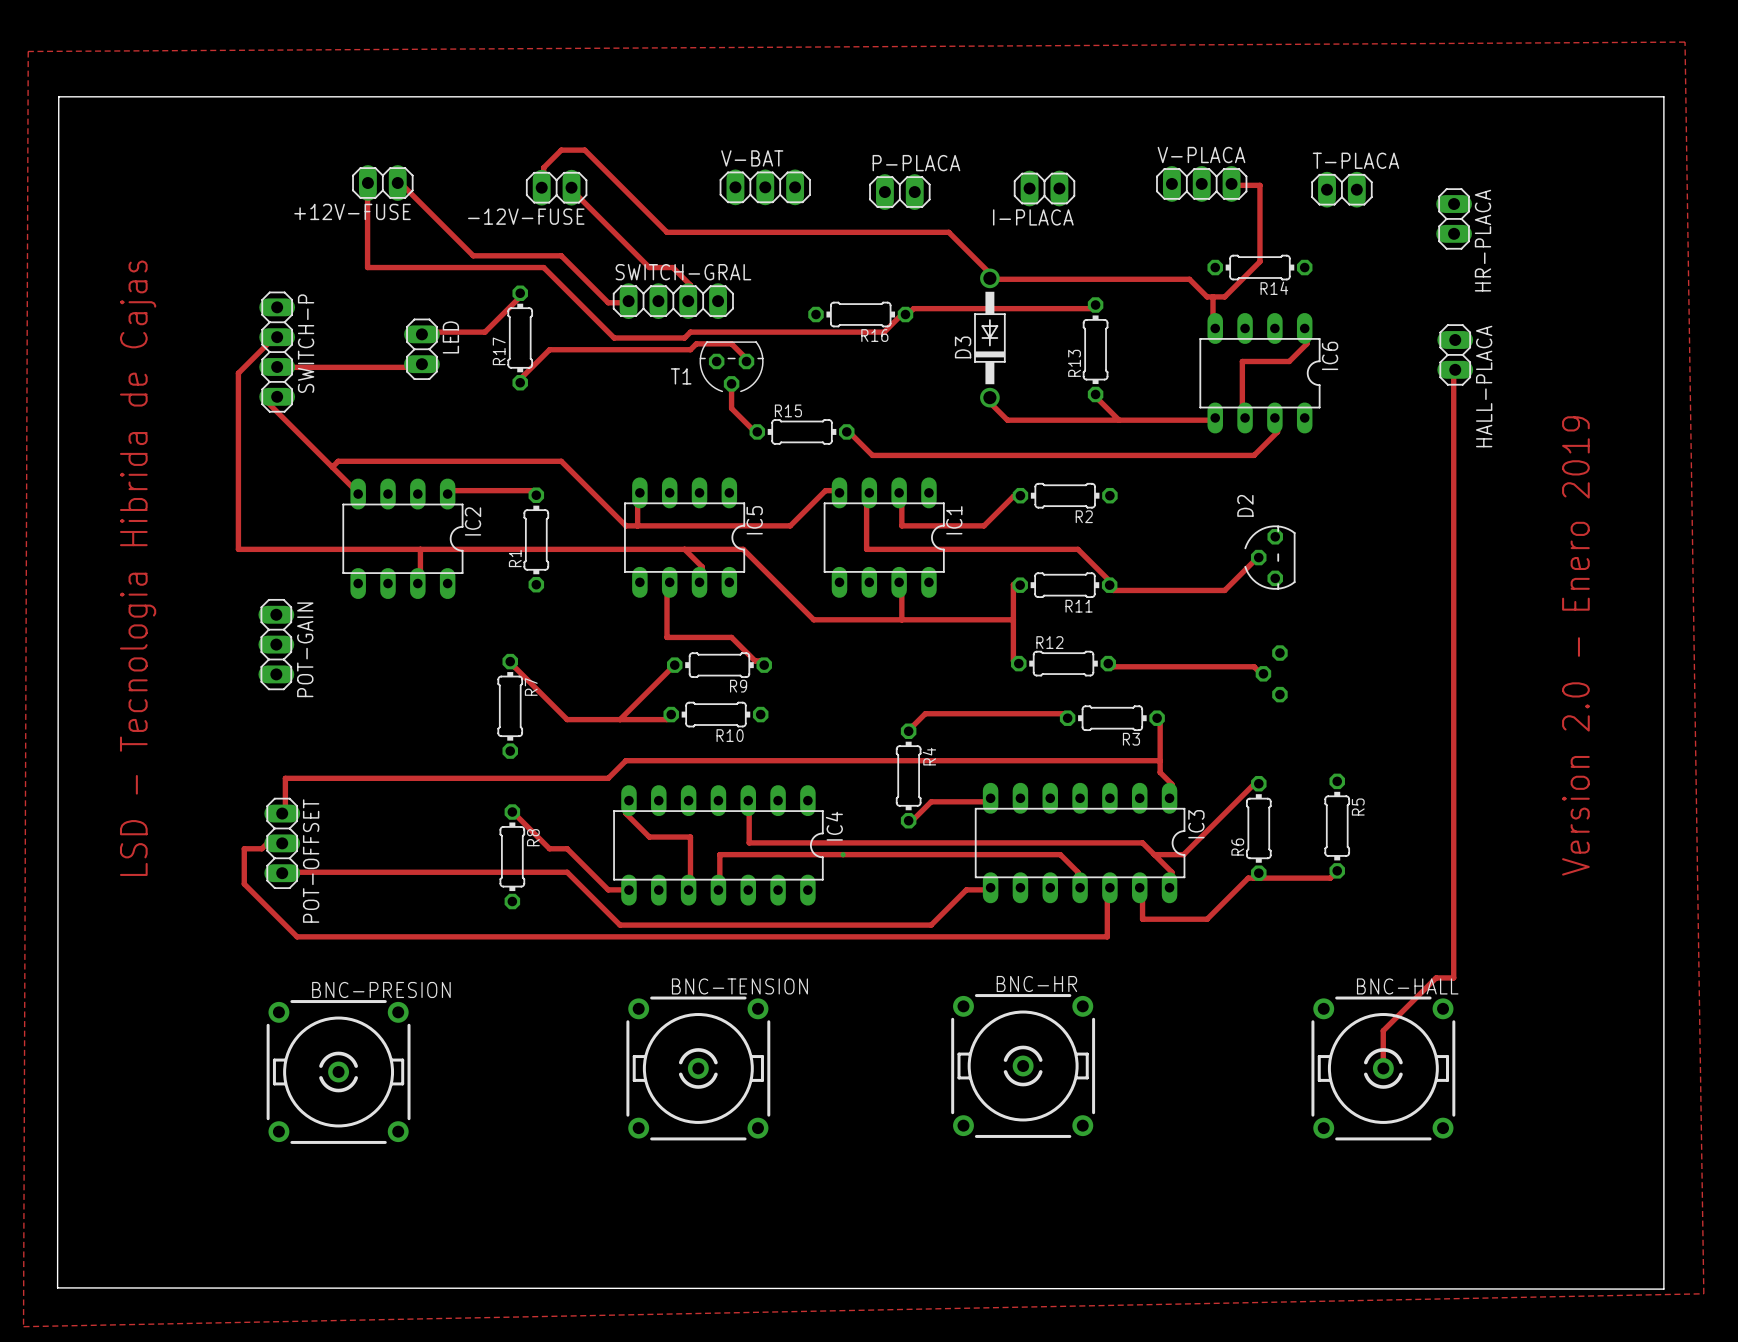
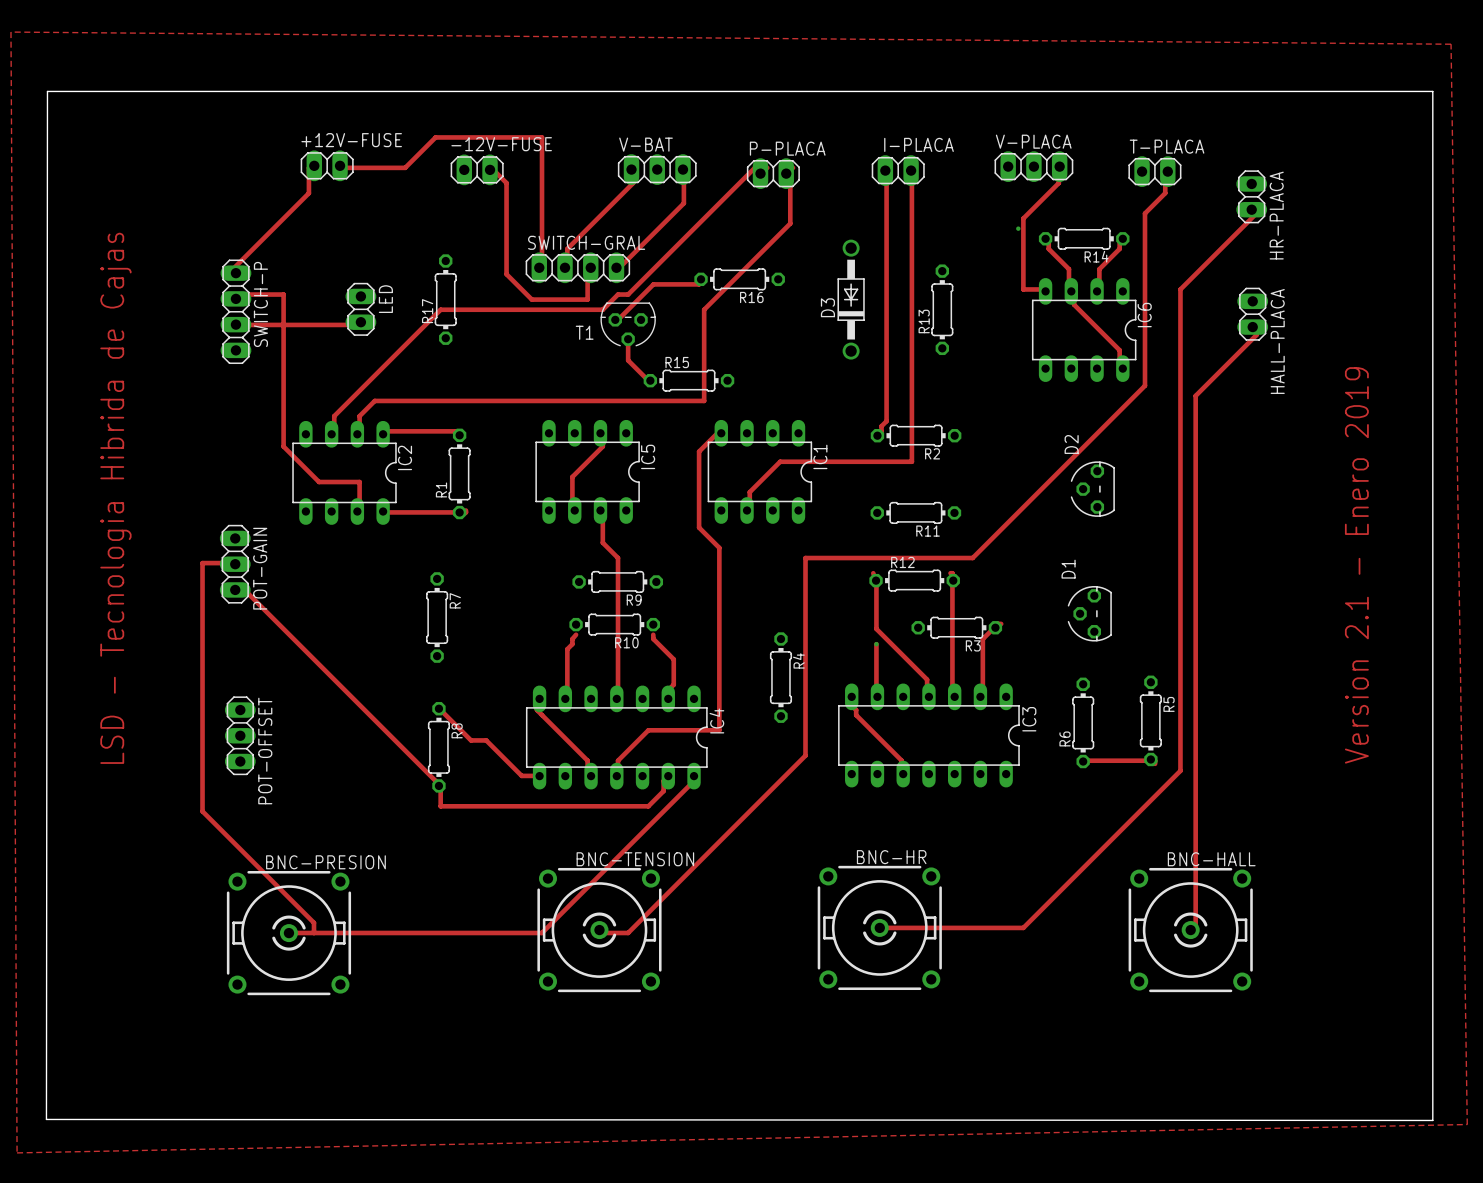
zone outline: (1685, 42) (28, 51) (23, 1326) -> (1451, 44) (10, 32) (17, 1152)
track: (561, 150) (543, 167) (543, 185) (541, 187) -> (481, 137) (435, 137) (405, 167) (337, 167)
track: (584, 150) (667, 232) (948, 232) (989, 273) (989, 279) (1189, 279) (1207, 296) (1224, 296) (1259, 261) (1259, 185) (1231, 183) -> (501, 137) (542, 137) (542, 269) (538, 269)
track: (367, 183) (367, 267) (543, 267) (614, 338) (620, 338) -> (489, 167) (491, 167) (506, 183) (506, 274) (531, 299)
track: (397, 183) (402, 185) (473, 255) (561, 255) (608, 302) (628, 301) -> none
track: none -> (311, 167) (308, 167) (308, 193) (232, 271)
track: none -> (632, 167) (633, 183) (567, 248) (567, 269) (564, 269)
track: none -> (684, 167) (683, 203) (616, 269)
track: none -> (793, 167) (790, 167) (790, 223) (704, 309) (704, 400) (374, 400) (359, 416) (359, 431) (357, 433)
track: none -> (888, 167) (886, 167) (886, 421) (881, 426) (881, 431) (877, 435)
track: none -> (1168, 167) (1165, 167) (1165, 193) (1144, 213) (1144, 385) (972, 558) (805, 558) (805, 755) (628, 932) (602, 932) (599, 930)
track: (571, 187) (649, 267) (672, 267) (690, 285) (690, 296) (688, 301) -> none
+12V-FUSE name position: +12V-FUSE (352, 211) -> +12V-FUSE (351, 140)
-12V-FUSE name position: -12V-FUSE (526, 216) -> -12V-FUSE (501, 144)
I-PLACA name position: I-PLACA (1033, 217) -> I-PLACA (918, 144)
track: none -> (1256, 211) (1256, 213) (1180, 289) (1180, 770) (1023, 927) (881, 927)
via: none -> (1018, 228)
track: none -> (1045, 238) (1048, 238) (1048, 248) (1068, 269) (1068, 289) (1074, 294) (1074, 304) (1119, 350) (1119, 365) (1122, 368)
track: none -> (1122, 238) (1119, 238) (1119, 248) (1099, 269) (1099, 289) (1097, 291)
track: (520, 293) (520, 296) (484, 332) (426, 332) (421, 334) -> none
track: (1213, 296) (1213, 326) -> (1059, 167) (1058, 183) (1023, 218) (1023, 289) (1043, 289)
track: none -> (590, 269) (587, 269) (587, 299)
track: (1095, 305) (1095, 308) (913, 308) (907, 314) (901, 314) (884, 332) (731, 332) -> (767, 167) (764, 167) (764, 162) (759, 162) (628, 294)
track: none -> (701, 279) (699, 279) (699, 284) (653, 284) (618, 319) (615, 319)
track: (1304, 328) (1306, 332) (1306, 343) (1289, 361) (1242, 361) (1242, 414) (1245, 417) -> none
track: (719, 332) (690, 332) (684, 338) -> (618, 294) (602, 309) (592, 309)
track: (277, 337) (273, 338) (238, 373) (238, 549) (373, 549) -> (232, 296) (232, 294) (283, 294) (283, 446) (319, 482)
track: (549, 349) (520, 379) (520, 382) -> (471, 309) (440, 309) (334, 416) (334, 431) (331, 433)
track: (690, 349) (696, 343) (731, 343) (749, 361) (746, 361) -> none
track: (1455, 369) (1453, 373) (1453, 977) (1436, 977) (1383, 1030) (1383, 1068) -> none
track: none -> (1256, 332) (1256, 335) (1195, 395) (1195, 927)
track: (1095, 394) (1095, 396) (1119, 420) -> none
track: (277, 396) (267, 396) (267, 402) (358, 494) -> none
track: (989, 397) (989, 402) (1007, 420) (1213, 420) (1215, 417) -> none
track: (1274, 417) (1277, 420) (1277, 431) (1254, 455) (872, 455) (849, 431) (846, 431) -> none
track: (332, 467) (338, 461) (561, 461) (625, 525) (790, 525) (825, 490) (837, 490) -> none
track: (639, 492) (637, 496) (637, 525) -> none
track: (869, 492) (866, 496) (866, 549) (1077, 549) (1113, 584) (1109, 585) (1113, 590) (1224, 590) (1258, 557) -> none
track: (899, 492) (901, 496) (901, 525) (907, 525) -> (747, 510) (749, 507) (749, 492) (780, 461)
track: (1020, 495) (1013, 496) (984, 525) -> (914, 167) (911, 167) (911, 461) (846, 461)
track: (420, 549) (743, 549) (813, 619) (1013, 619) -> none
track: (684, 549) (702, 566) (702, 578) (699, 582) -> (616, 698) (618, 558) (602, 542) (602, 512) (600, 510)
track: none -> (383, 510) (384, 512) (466, 512) (466, 510)
track: (669, 582) (667, 584) (667, 637) (731, 637) (755, 660) (760, 660) (764, 665) -> (574, 510) (572, 507) (572, 476) (602, 446) (602, 436) (600, 433)
track: (899, 582) (901, 584) (901, 619) -> none
track: (1020, 585) (1013, 584) (1013, 660) (1018, 663) -> none
track: none -> (232, 563) (202, 563) (202, 811) (313, 922) (313, 932)
text: Version 2.0 - Enero 2019 (1575, 645) -> Version 2.1 - Enero 2019 (1356, 565)
track: none -> (873, 573) (876, 583) (876, 628) (927, 679) (927, 694) (928, 696)
track: none -> (950, 573) (952, 573) (952, 694) (954, 696)
track: (510, 661) (567, 719) (667, 719) (671, 714) -> none
track: (1108, 663) (1113, 666) (1254, 666) (1263, 673) -> none
track: (674, 665) (620, 719) -> none
D1 side: bottom (1271, 673) -> top (1089, 613)
track: none -> (1001, 623) (998, 623) (982, 639) (982, 694) (980, 696)
track: (1067, 718) (1066, 713) (925, 713) (908, 731) -> none
track: (1157, 718) (1160, 719) (1160, 772) (1171, 784) (1171, 795) (1169, 798) -> none
track: none -> (576, 634) (572, 639) (572, 644) (567, 649) (567, 694) (565, 698)
track: none -> (653, 634) (653, 639) (673, 659) (673, 684) (668, 689) (668, 698)
track: none -> (876, 644) (877, 696)
via: none -> (876, 644)
track: (1160, 760) (625, 760) (608, 778) (285, 778) (285, 813) (282, 813) -> none
track: (1258, 783) (1254, 784) (1183, 854) (1154, 854) -> none
track: (748, 800) (749, 842) (1142, 842) (1171, 872) (1171, 884) (1169, 887) -> none
track: (989, 801) (931, 801) (913, 819) (908, 820) -> (851, 699) (851, 704) (856, 710) (856, 715) (901, 760) (903, 774)
track: (649, 837) (690, 837) (690, 889) (688, 890) -> (557, 730) (587, 760) (587, 775) (591, 776)
track: (282, 843) (267, 842) (261, 848) (244, 848) (244, 884) (297, 936) (1107, 936) (1107, 889) (1109, 887) -> none
via: (843, 854) -> none
track: (1337, 870) (1330, 878) (1259, 878) (1258, 873) (1254, 878) (1248, 878) (1207, 919) (1142, 919) (1142, 889) (1139, 887) -> none
track: (719, 872) (719, 854) (1060, 854) (1077, 872) (1077, 884) (1080, 887) -> (618, 760) (648, 730) (719, 730) (719, 547) (699, 527) (699, 451) (719, 431)
track: (282, 873) (567, 872) (620, 925) -> (232, 588) (232, 593) (248, 593) (440, 786) (440, 806) (531, 806)
track: none -> (1084, 763) (1084, 760) (1155, 760) (1155, 763)
track: (990, 887) (989, 889) (966, 889) (931, 925) (755, 925) -> (668, 776) (663, 780) (663, 791) (648, 806)
track: none -> (694, 776) (694, 780) (542, 932) (288, 933)

